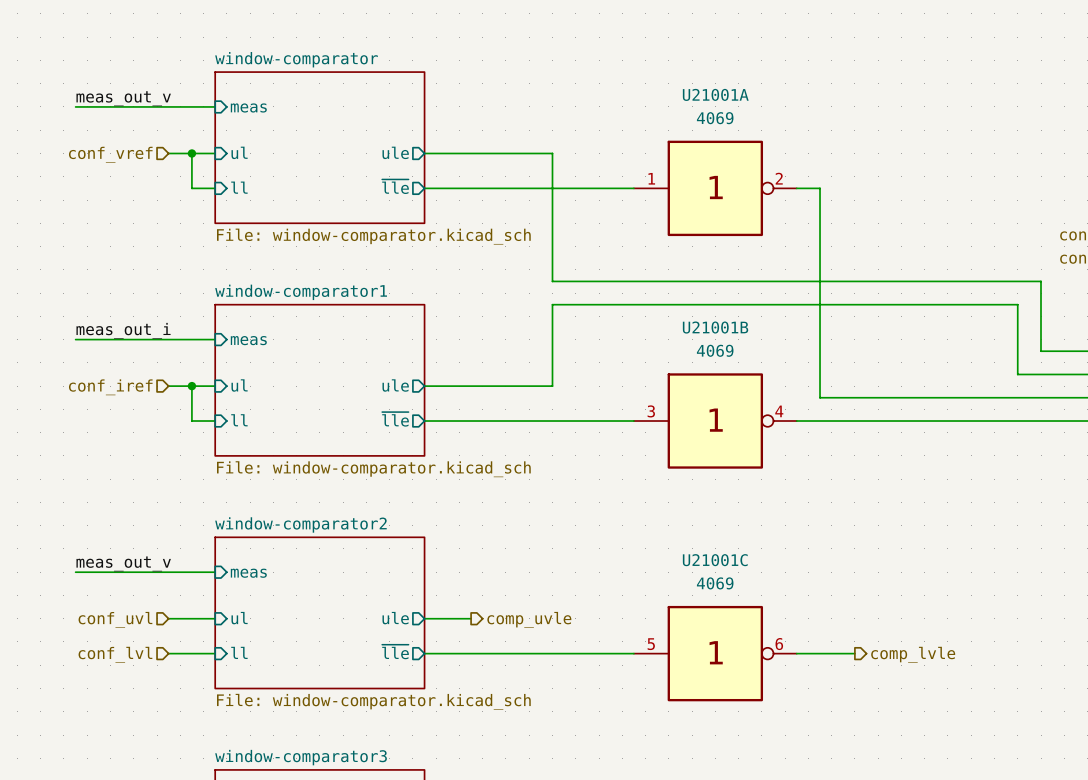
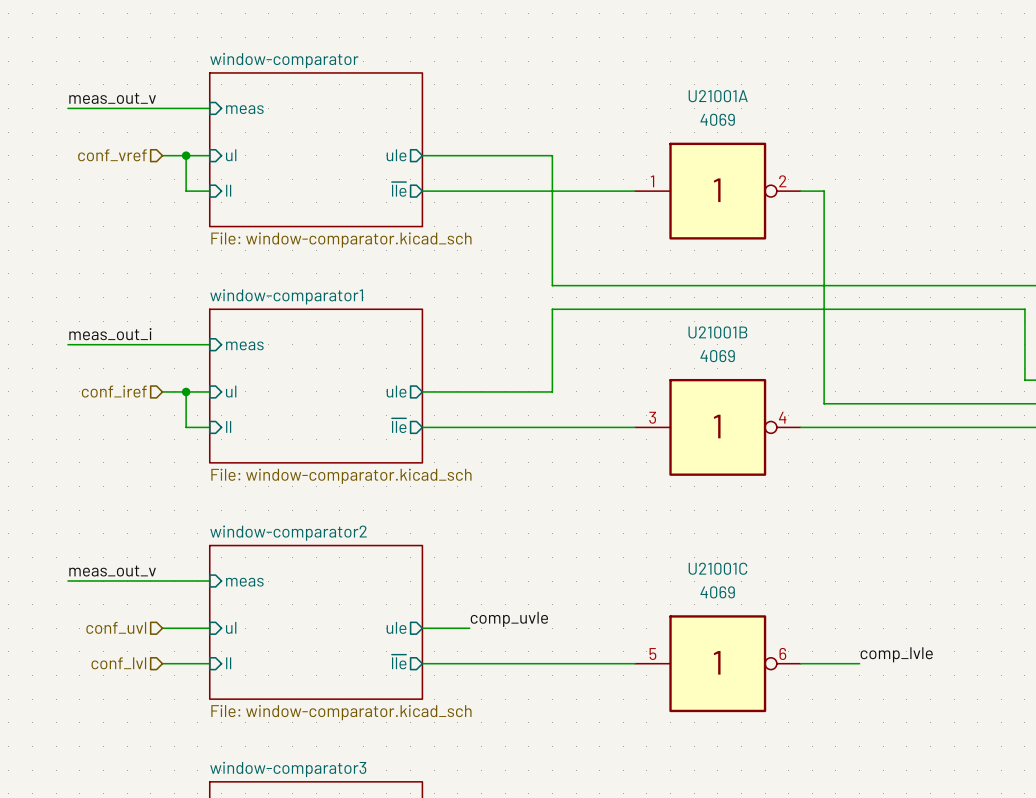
label: none -> comp_uvle (509, 619)
hierarchical label: comp_uvle (529, 619) -> none
label: none -> comp_lvle (896, 654)
hierarchical label: comp_lvle (913, 654) -> none

